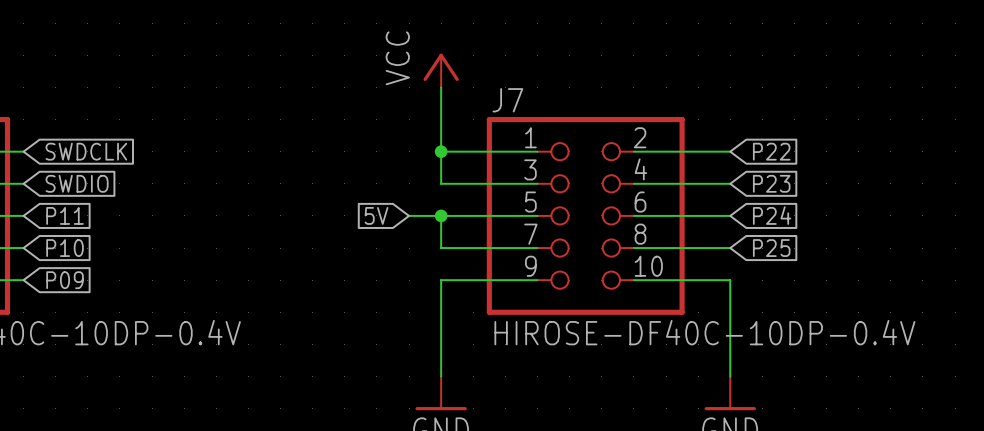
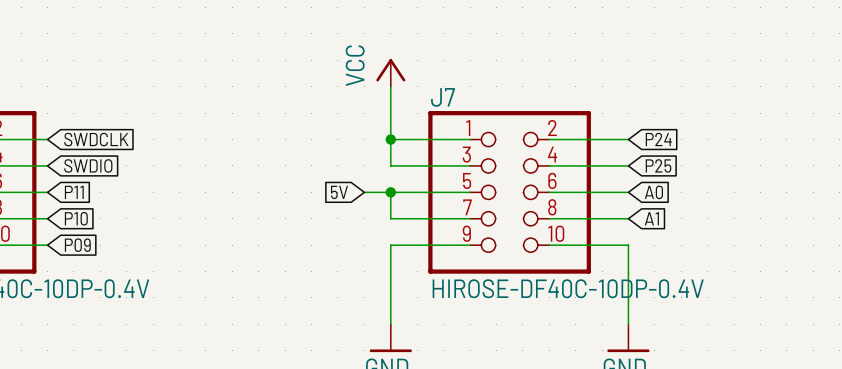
global label: P22 (771, 151) -> P24 (658, 139)
global label: P23 (771, 183) -> P25 (658, 165)
global label: P24 (772, 215) -> A0 (653, 192)
global label: P25 (771, 248) -> A1 (651, 218)

